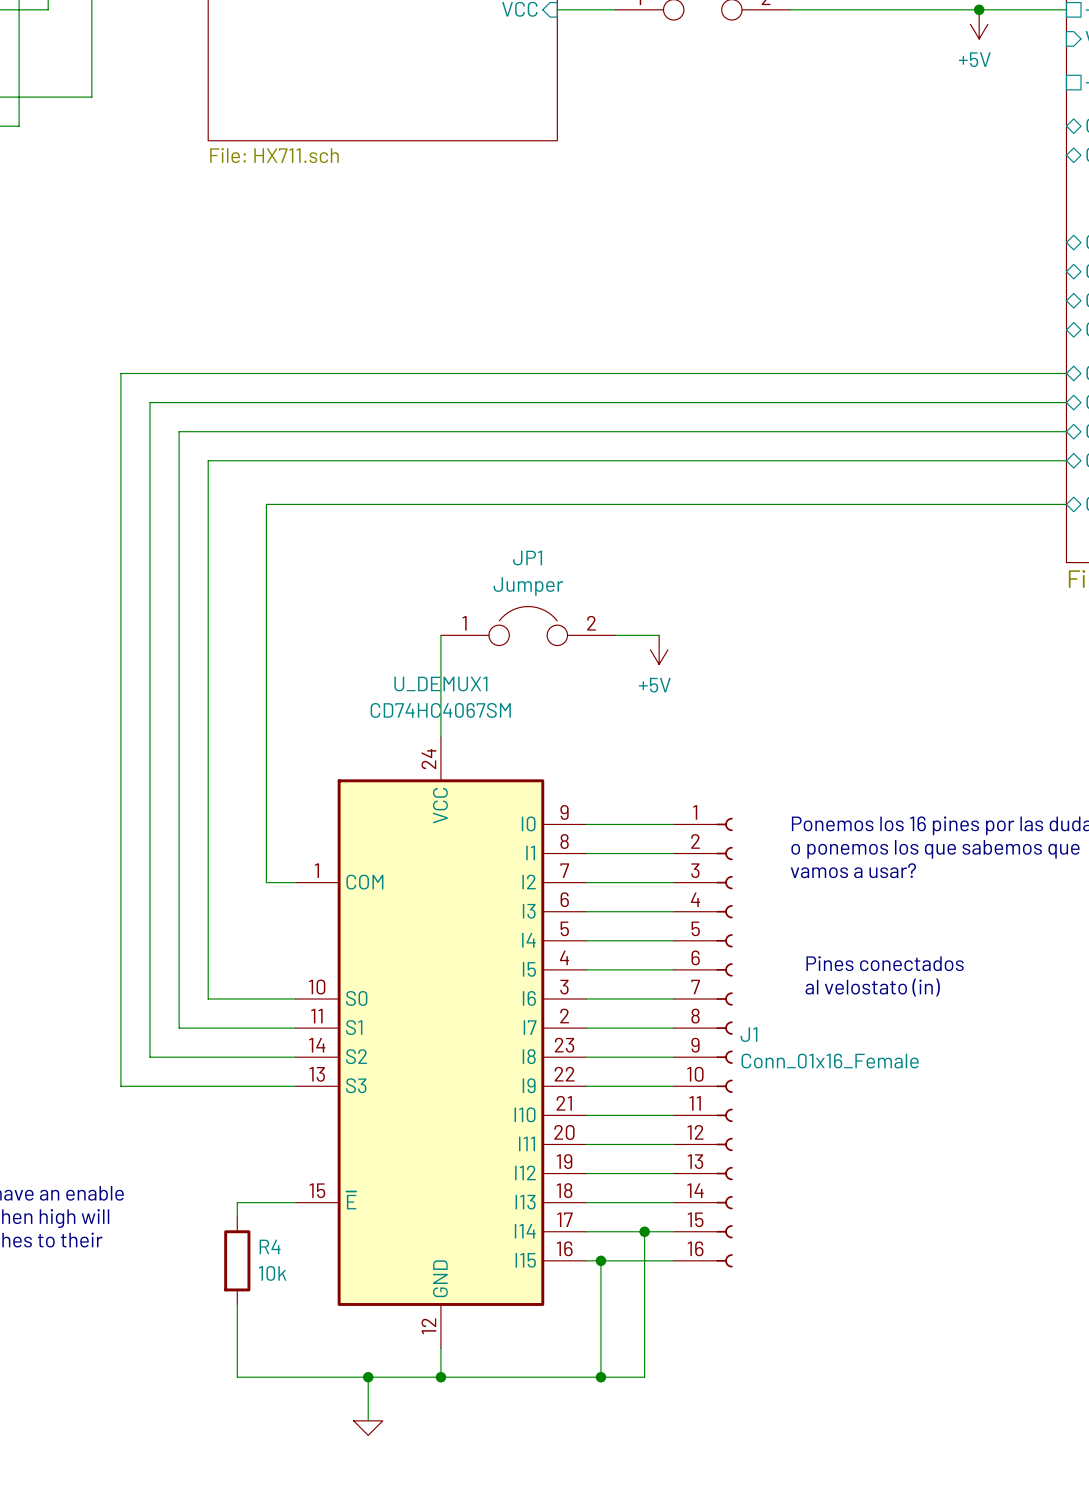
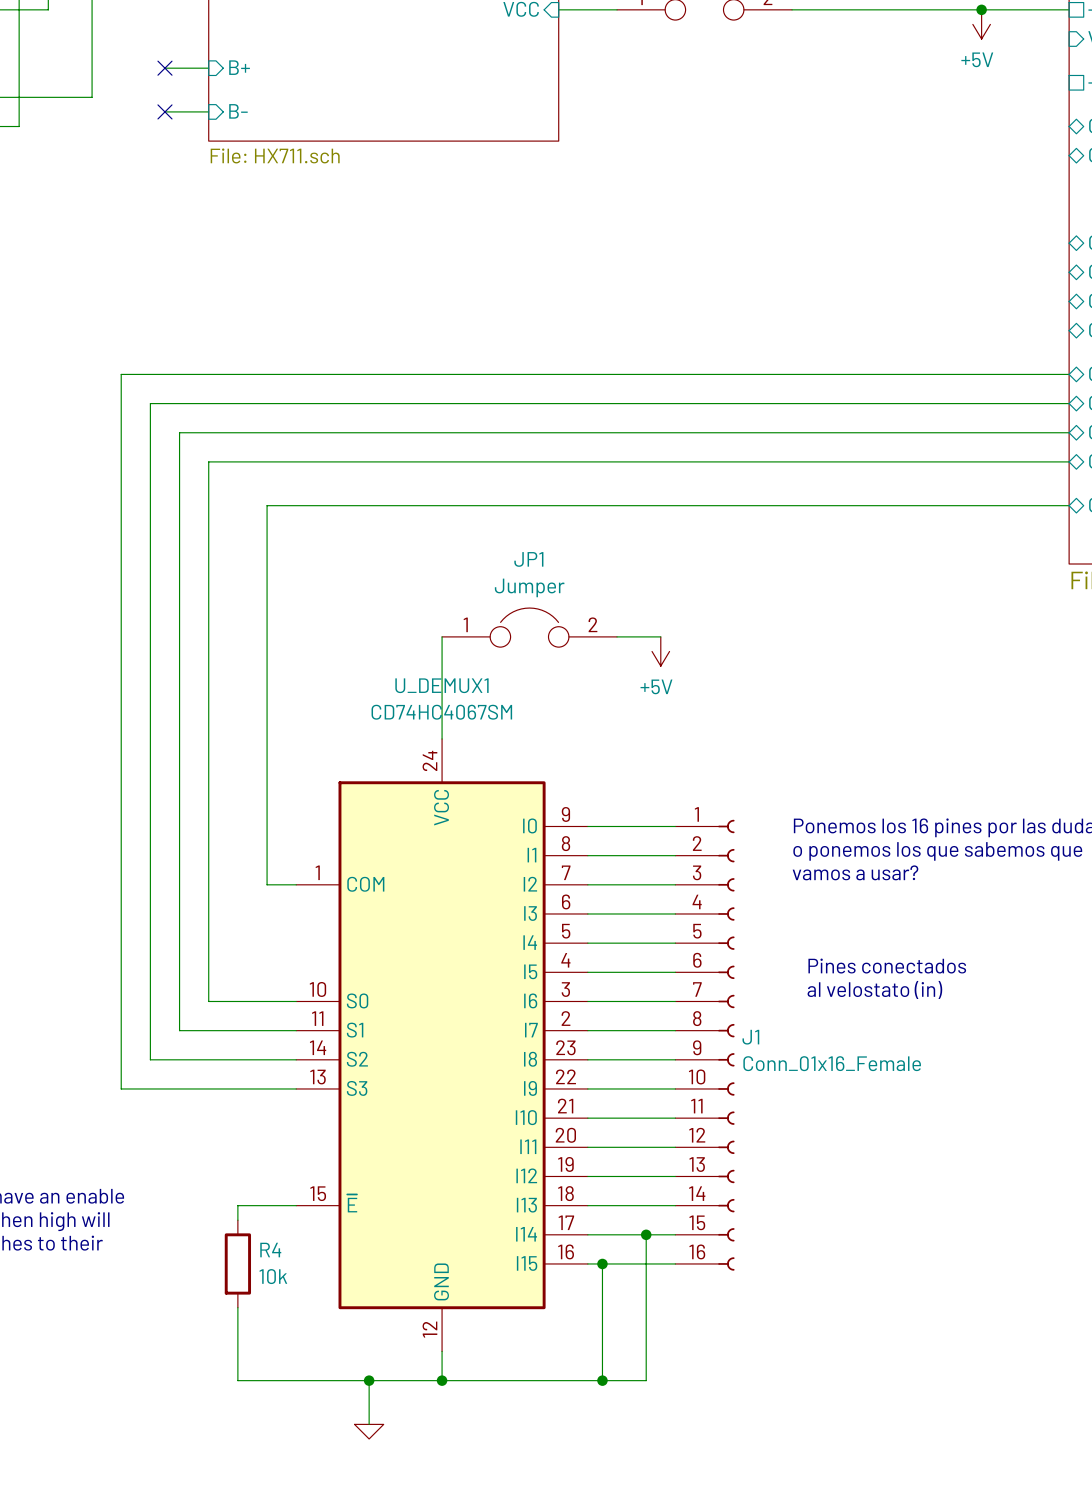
sheet pin: none -> B+ (239, 67)
wire: none -> (164, 68) (208, 68)
no-connect mark: none -> (164, 68)
wire: none -> (164, 111) (208, 111)
no-connect mark: none -> (164, 111)
sheet pin: none -> B- (238, 111)

